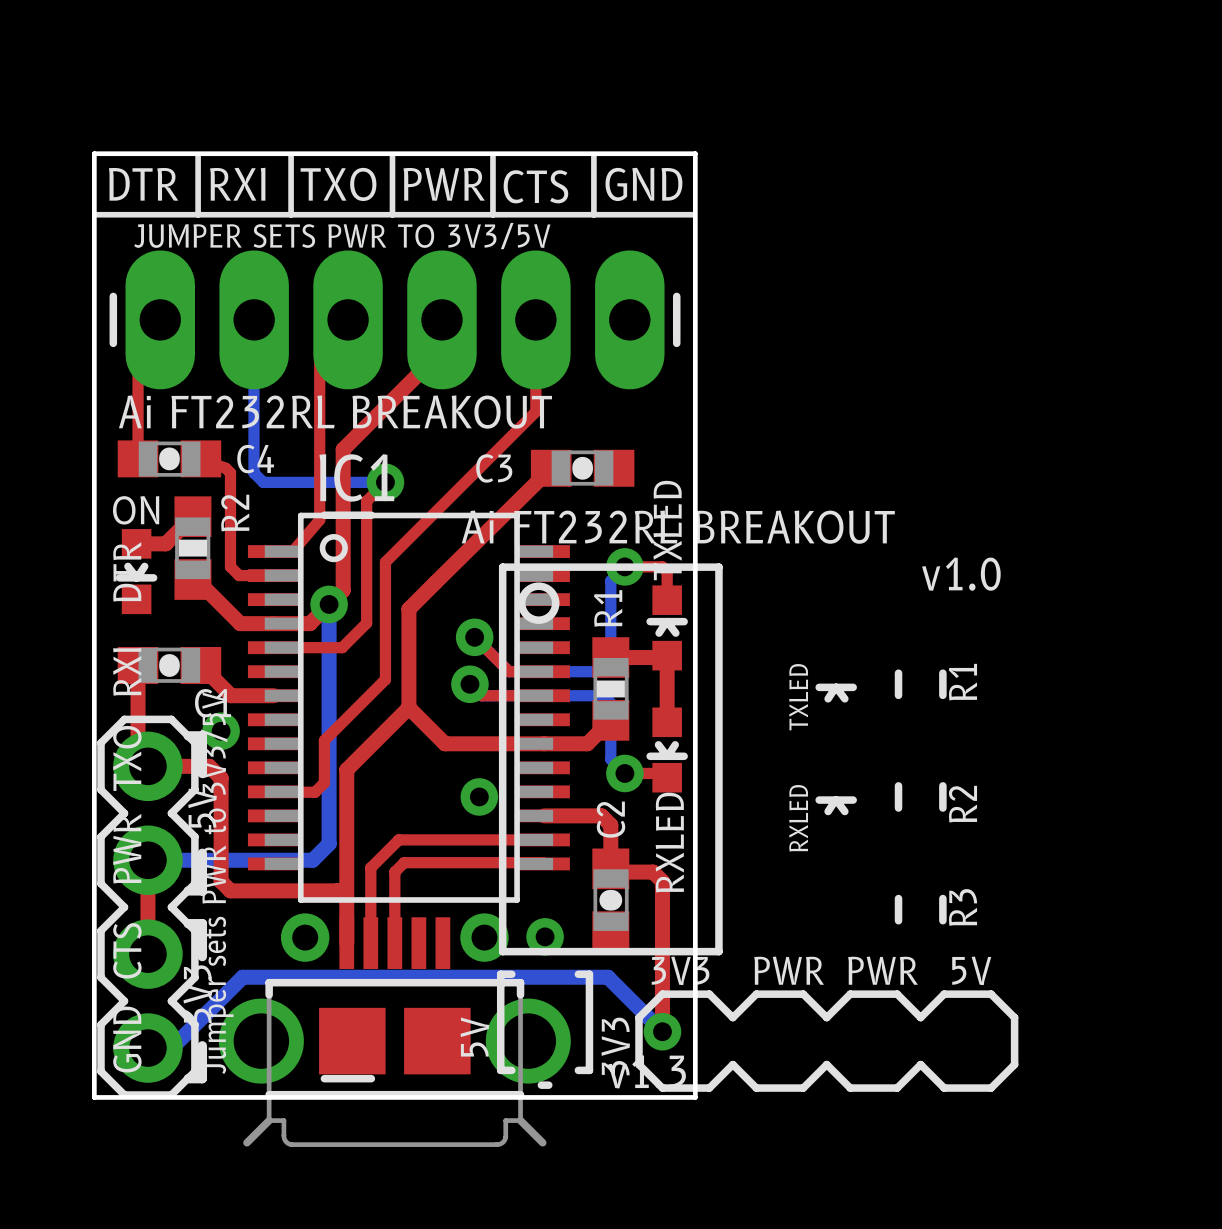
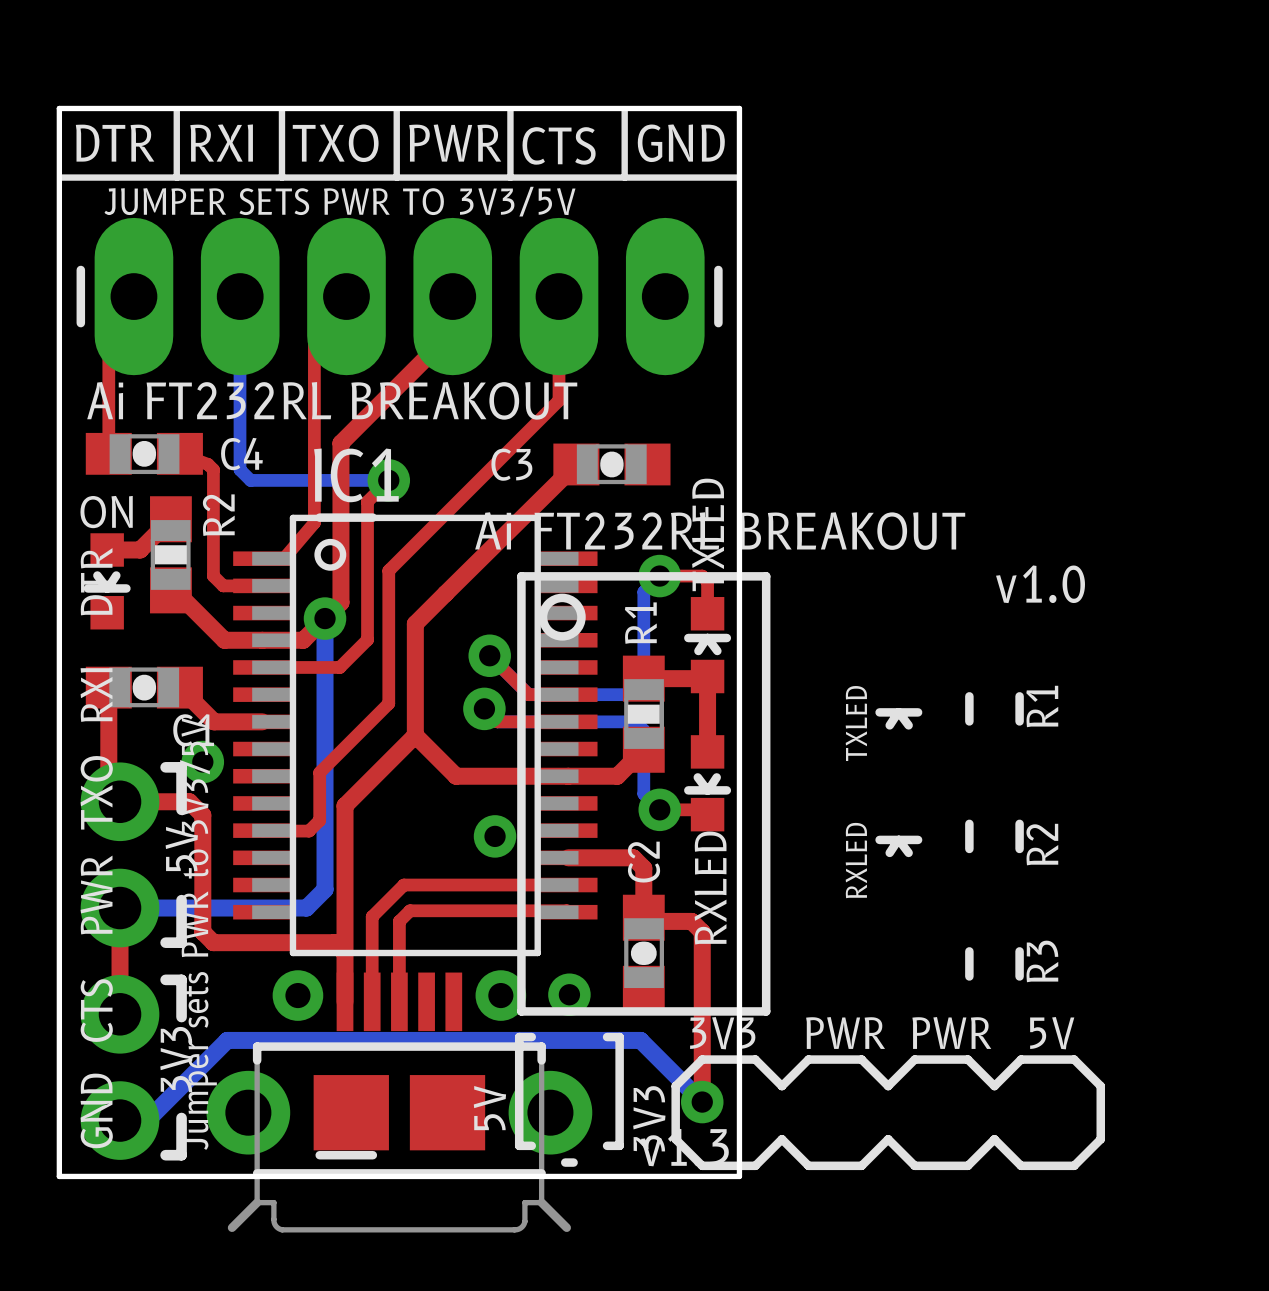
part footprint: [97, 715, 199, 1099] -> [80, 762, 160, 1160]
part footprint: [218, 913, 571, 1147] -> [206, 970, 593, 1233]

